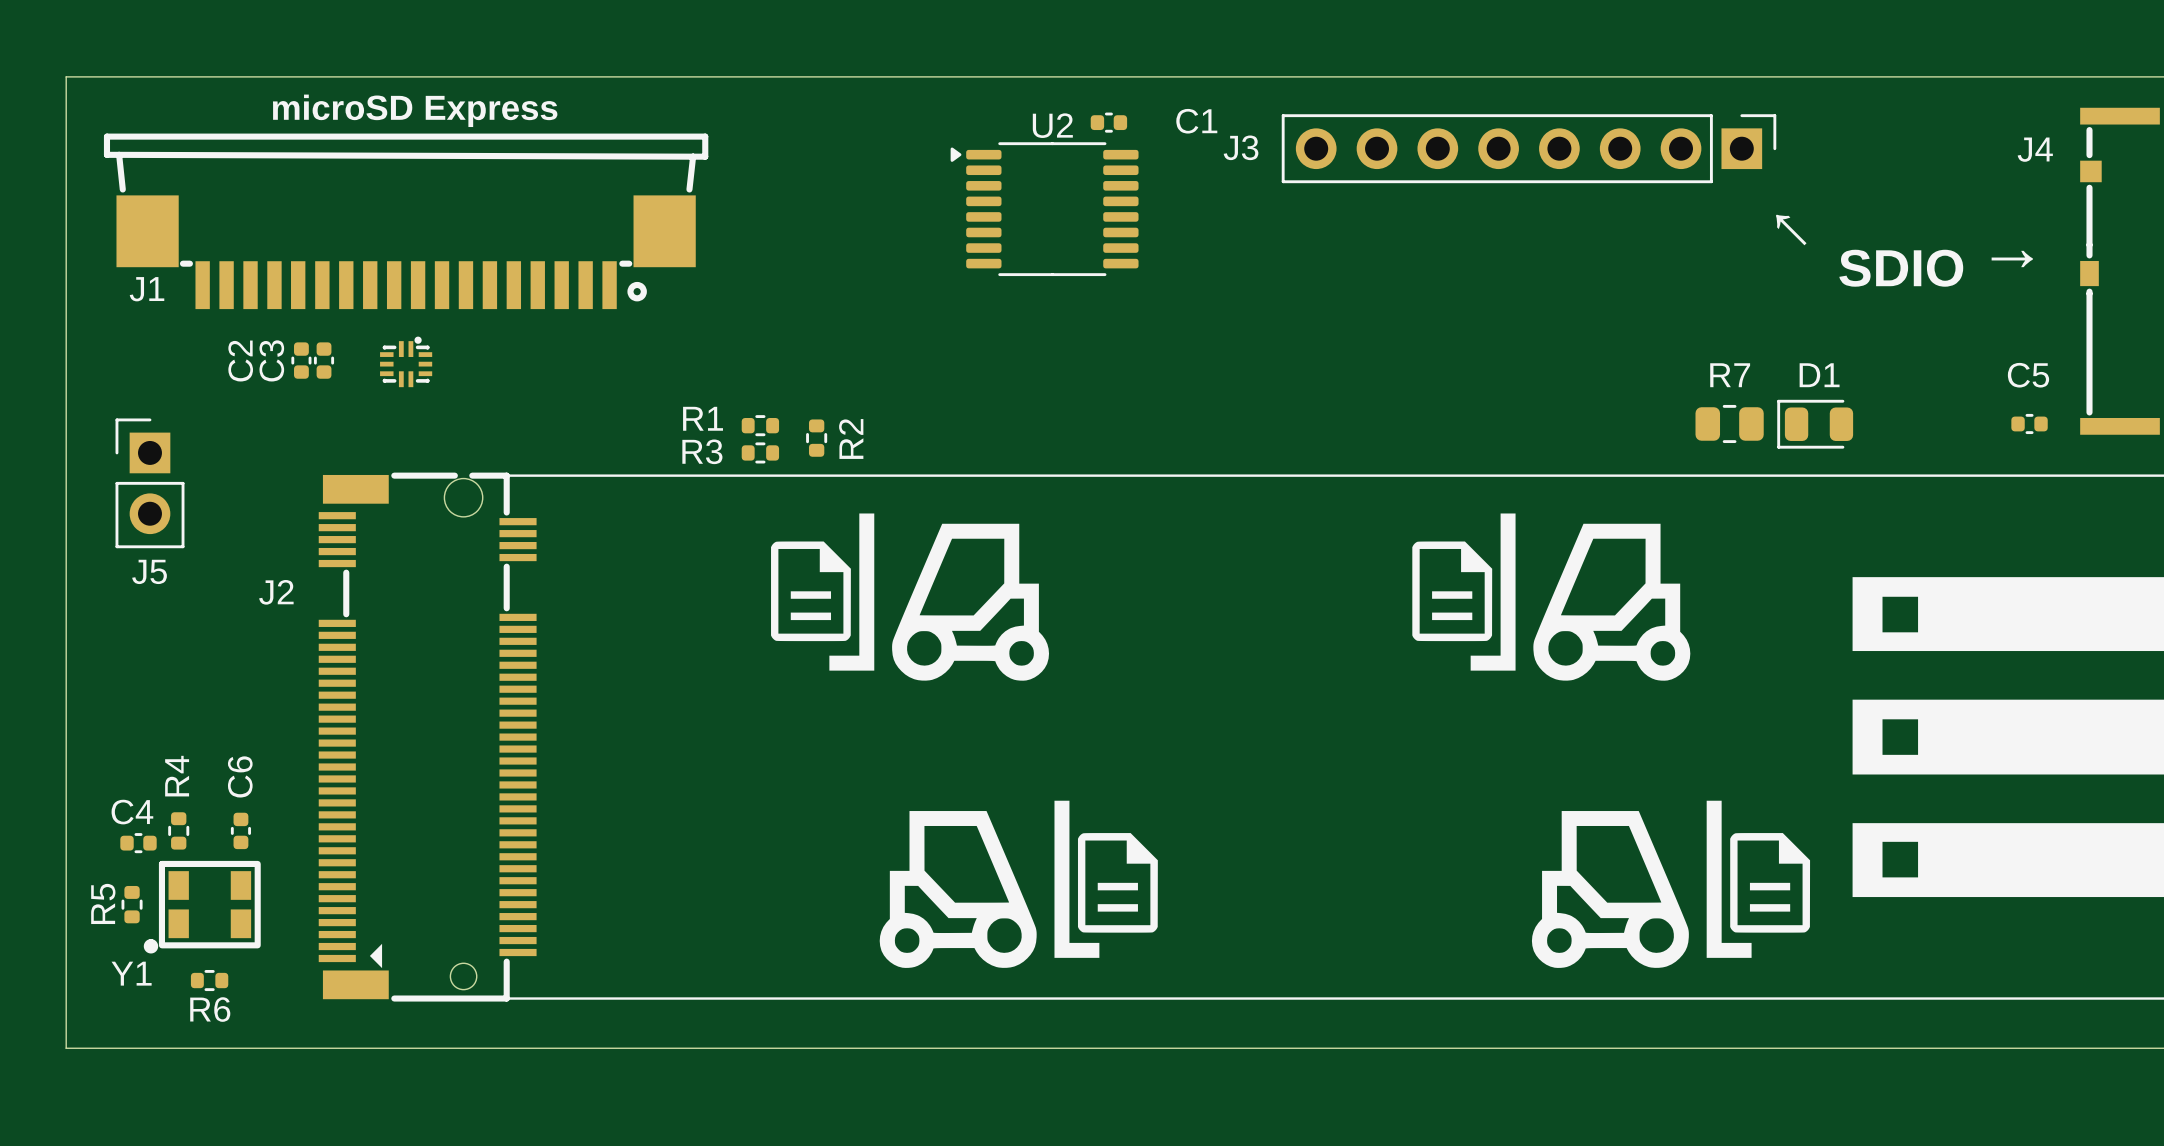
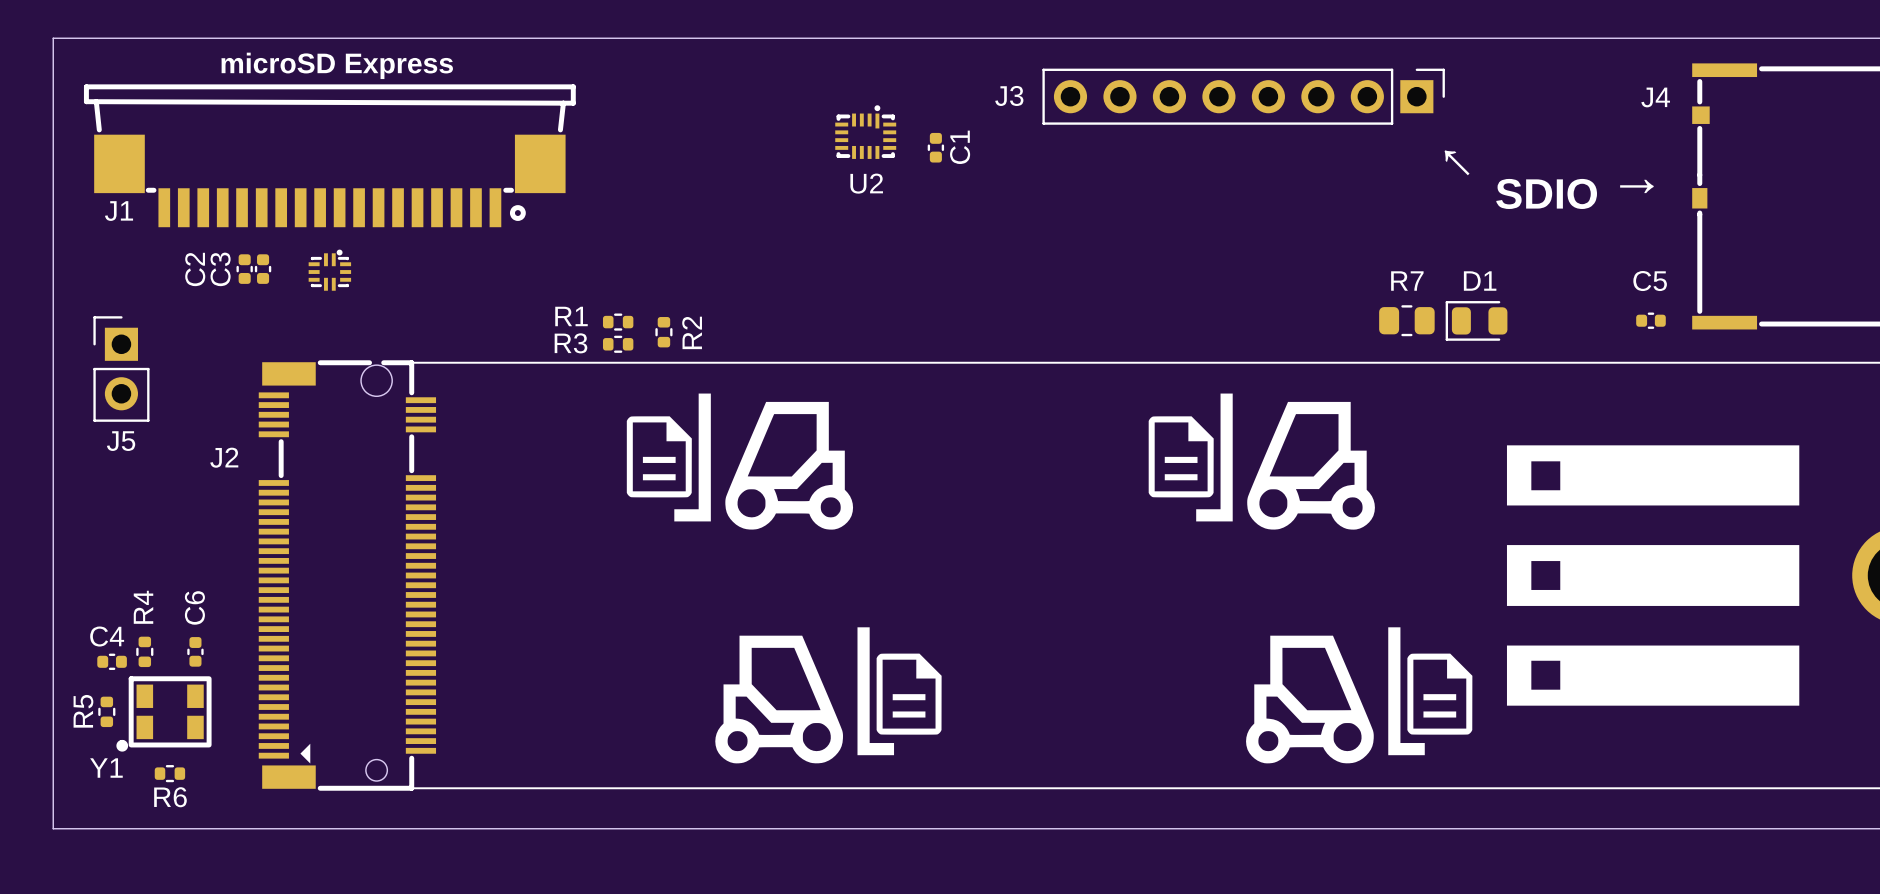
C1 name position: C1 (1196, 121) -> C1 (960, 147)
C1 rotation: 0° (1108, 122) -> 90° clockwise (935, 147)
C1 position: (1108, 122) -> (935, 147)
U2 name position: U2 (1052, 125) -> U2 (866, 183)
U2 footprint: [950, 142, 1139, 277] -> [835, 105, 897, 159]

